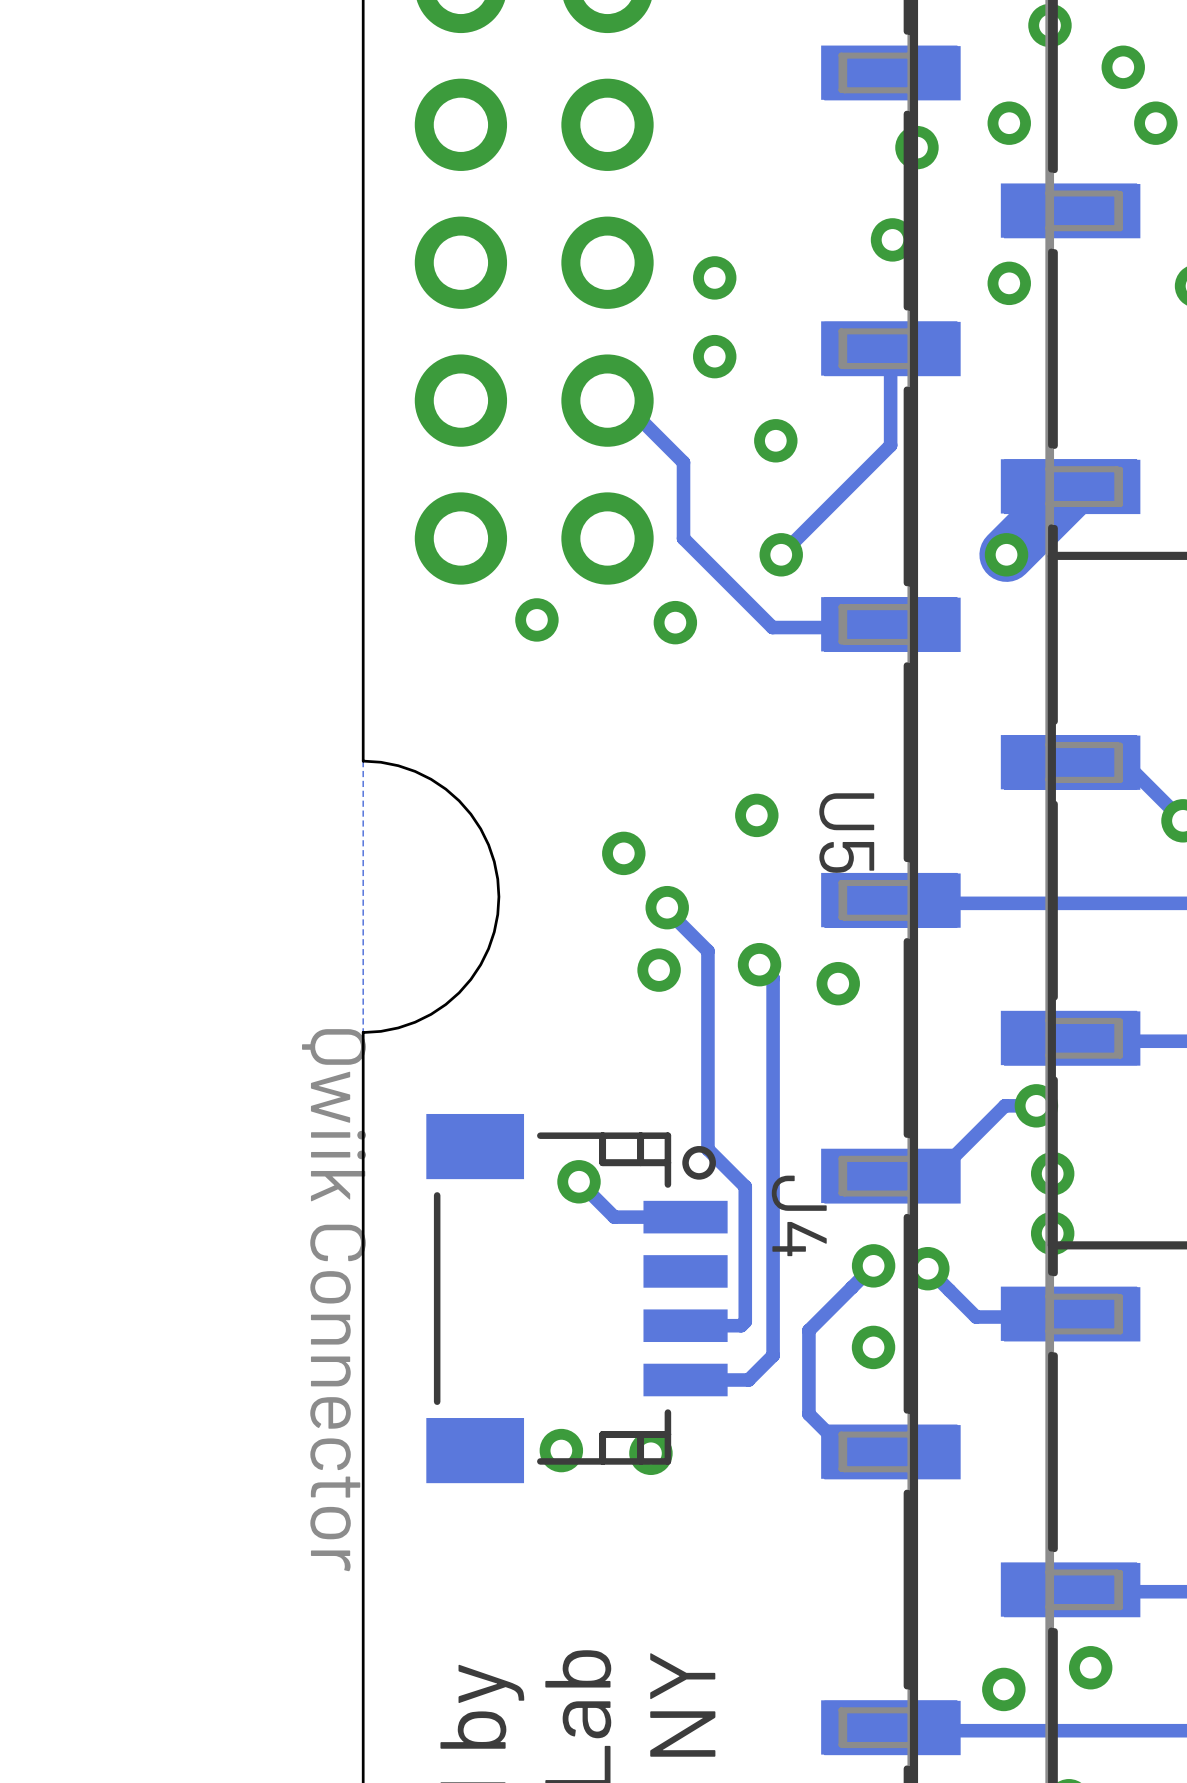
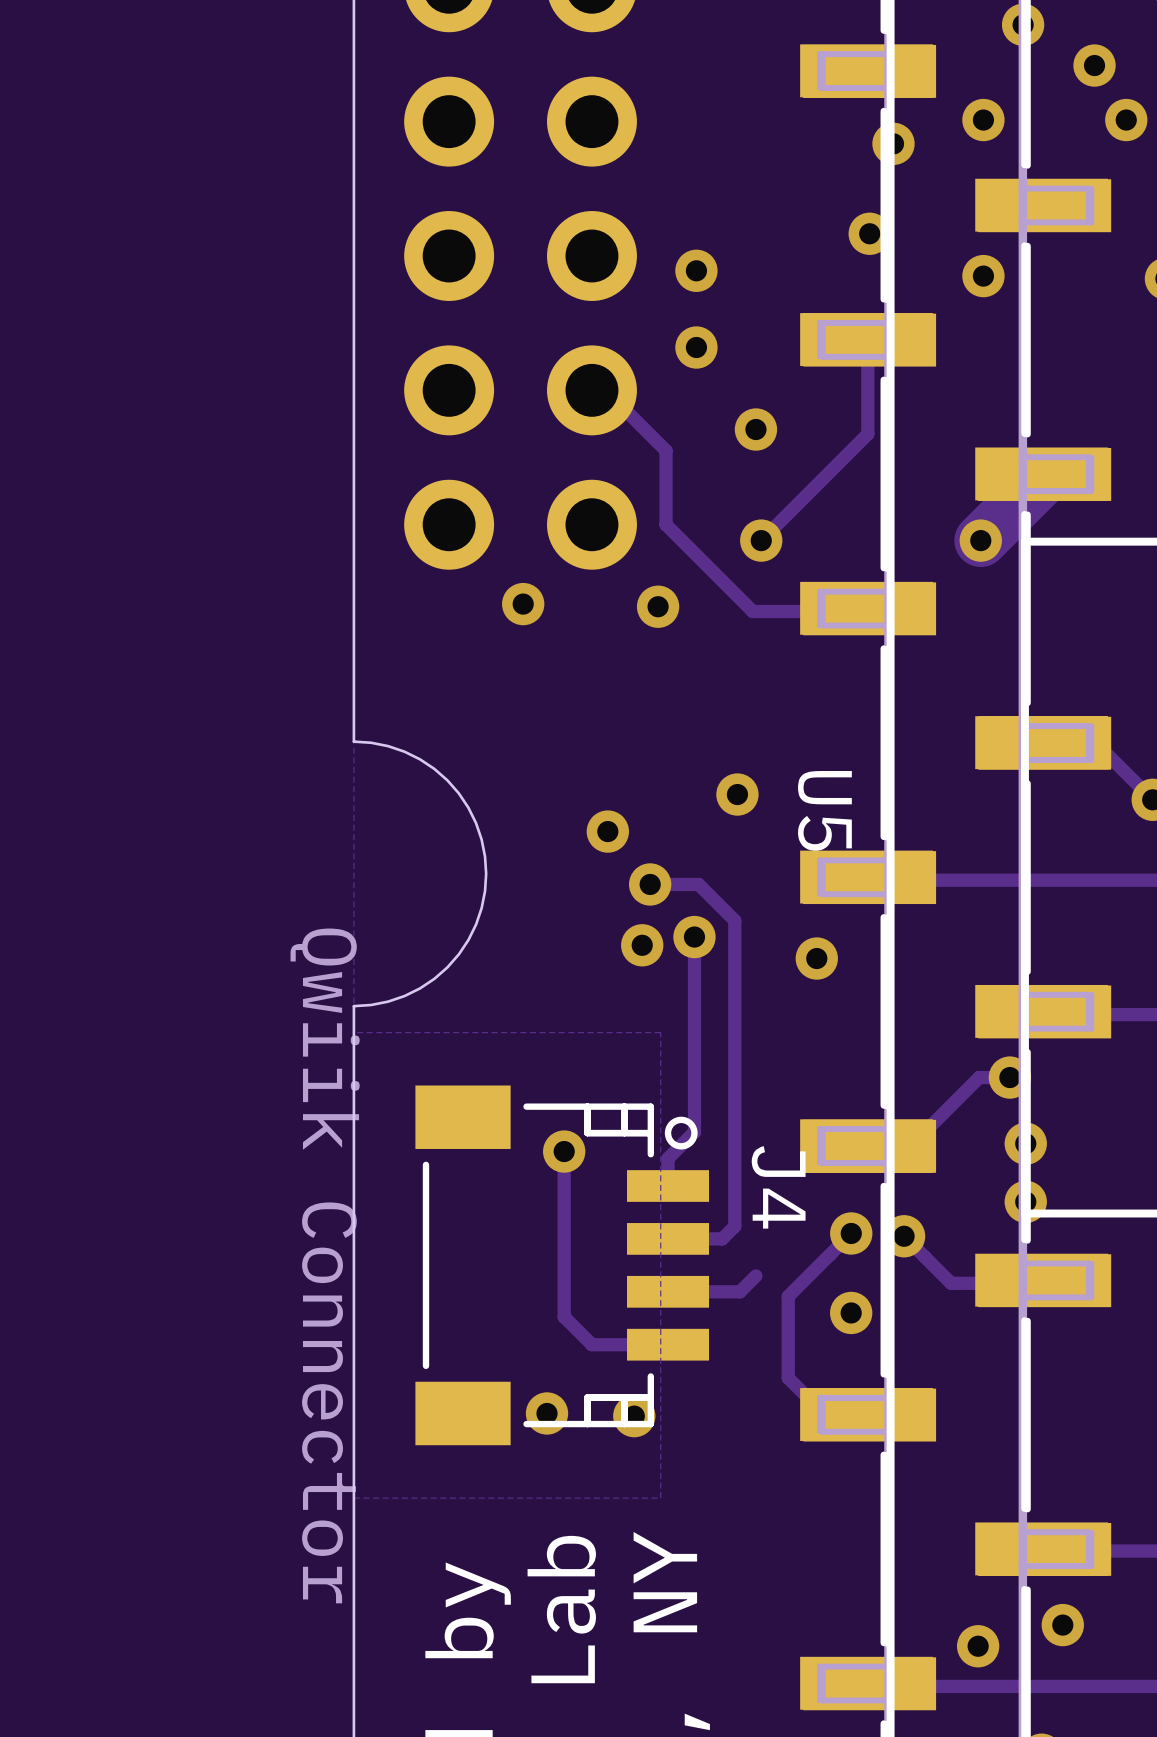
track: (667, 907) (667, 910) (707, 951) (707, 1149) (745, 1186) (745, 1321) (741, 1325) -> (650, 884) (698, 884) (734, 920) (734, 1226) (722, 1238) (668, 1238)
track: none -> (694, 937) (694, 1132) (668, 1158) (668, 1186)
track: (759, 964) (773, 978) (773, 1355) (748, 1380) (685, 1380) -> none
via position: (759, 964) -> (694, 937)
zone outline: none -> (353, 1032) (660, 1032) (660, 1498) (353, 1498)
track: (579, 1181) (614, 1217) (685, 1217) -> (564, 1151) (564, 1316) (591, 1344) (668, 1344)
track: none -> (755, 1275) (740, 1291) (722, 1291)

